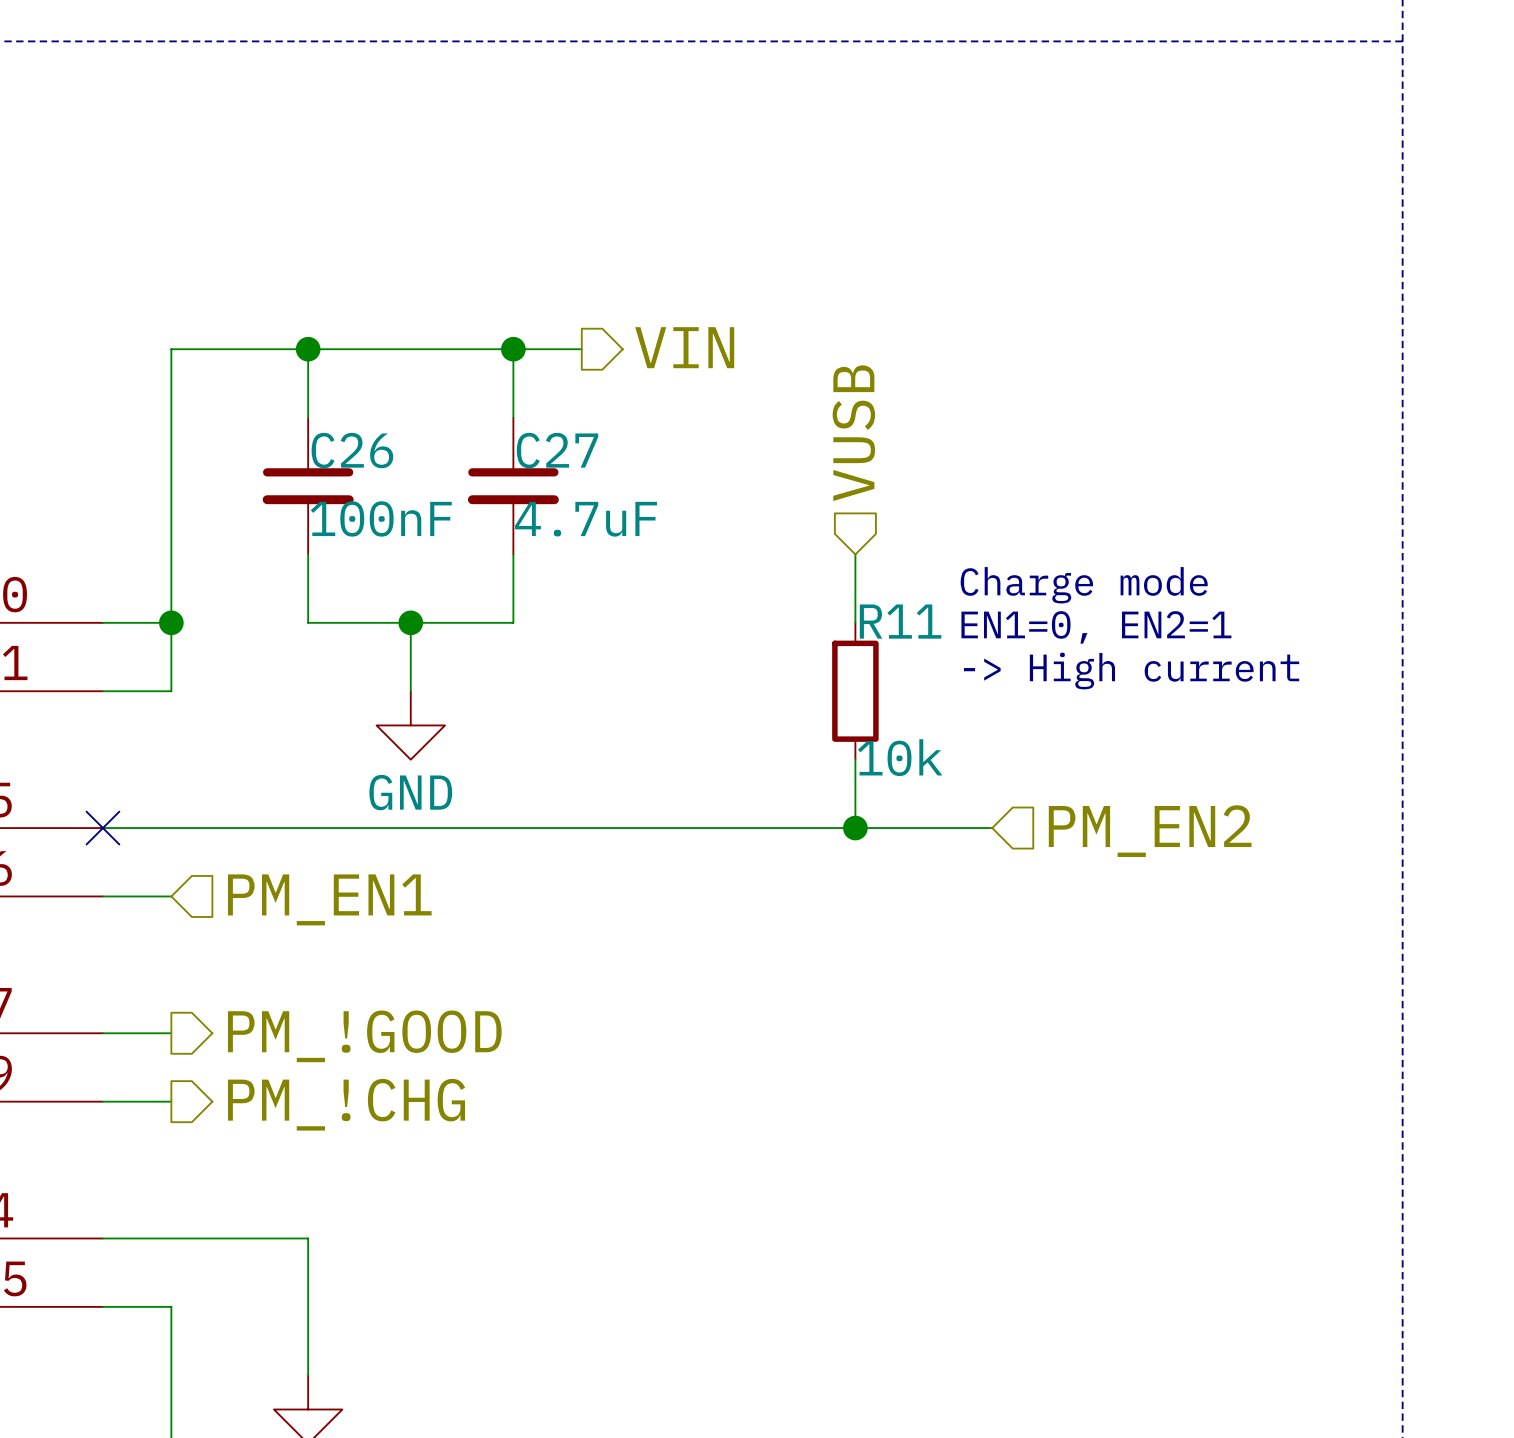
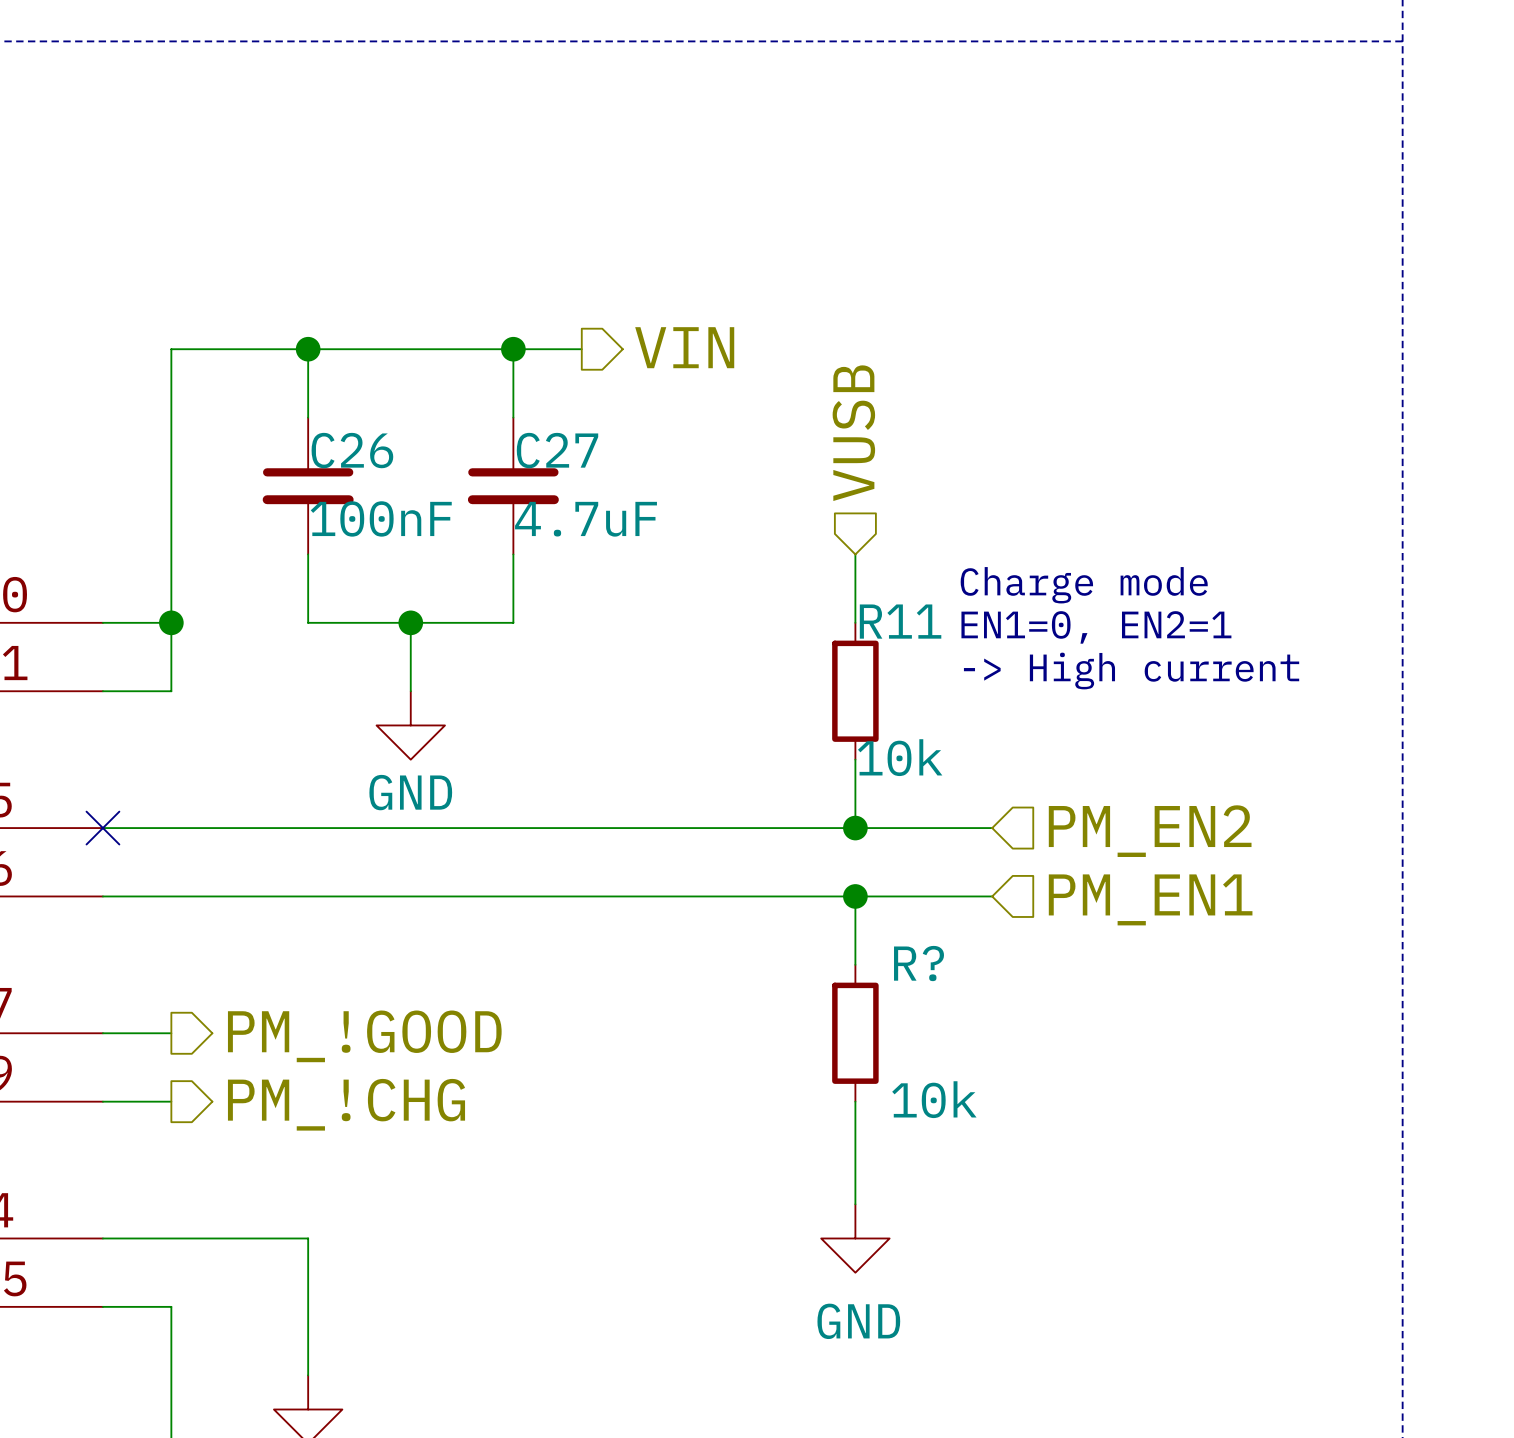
wire: none -> (171, 896) (992, 896)
wire: none -> (855, 896) (855, 964)
junction: none -> (855, 896)
hierarchical label: PM_EN1 (329, 899) -> none
hierarchical label: none -> PM_EN1 (1150, 899)
R?: none -> 10k (855, 1033)
wire: none -> (855, 1101) (855, 1204)
power symbol: none -> GND (855, 1238)

